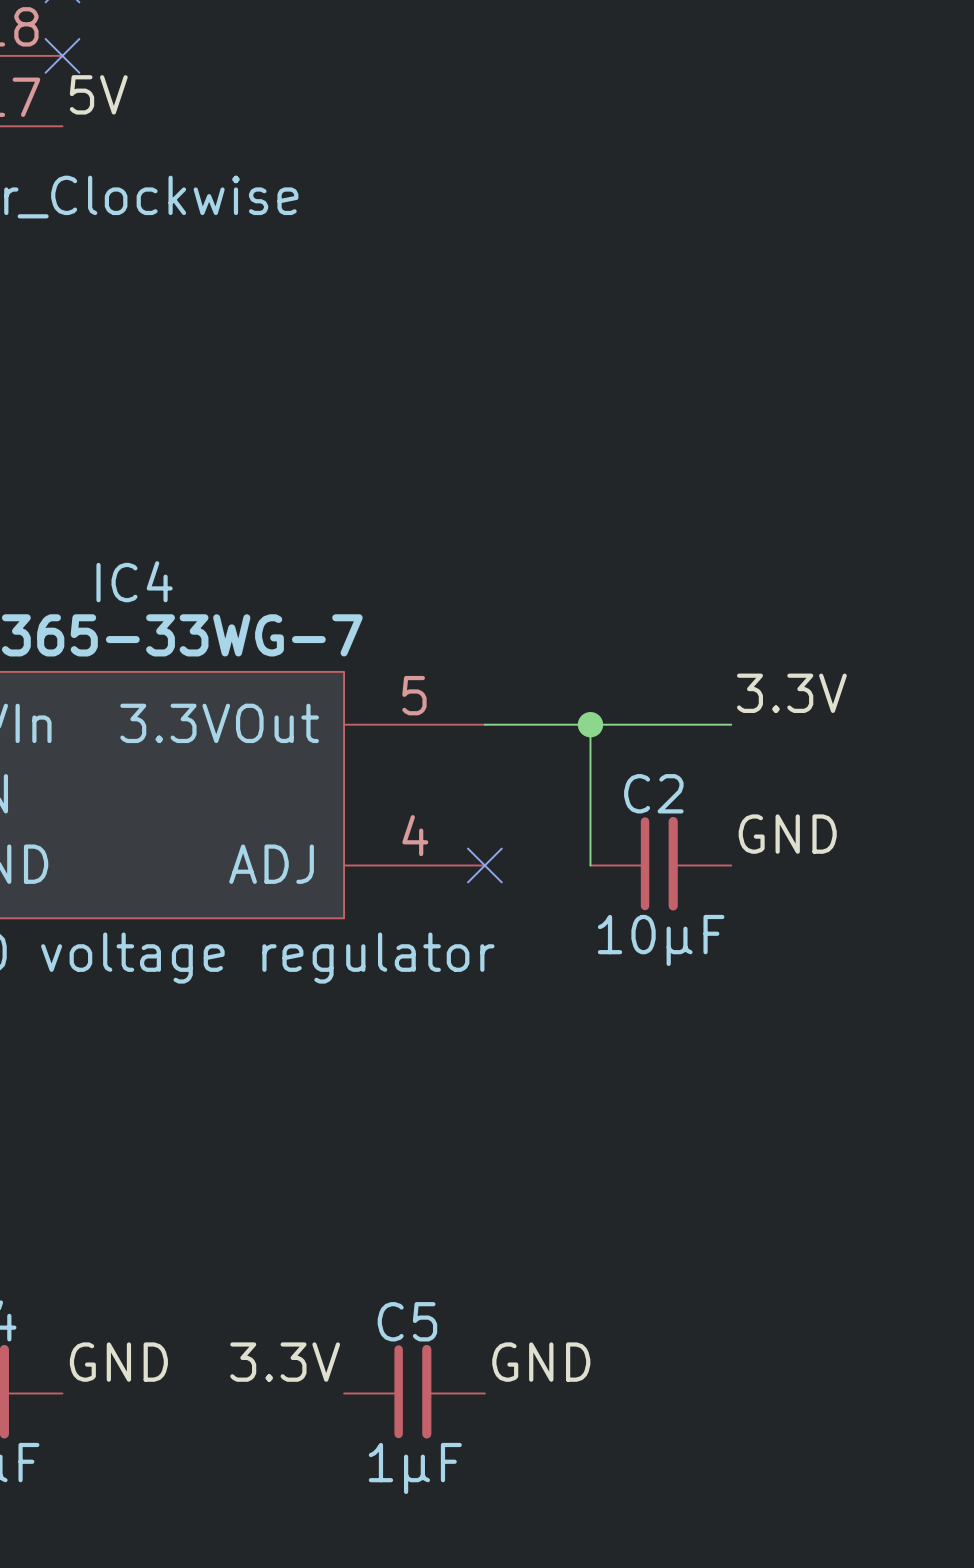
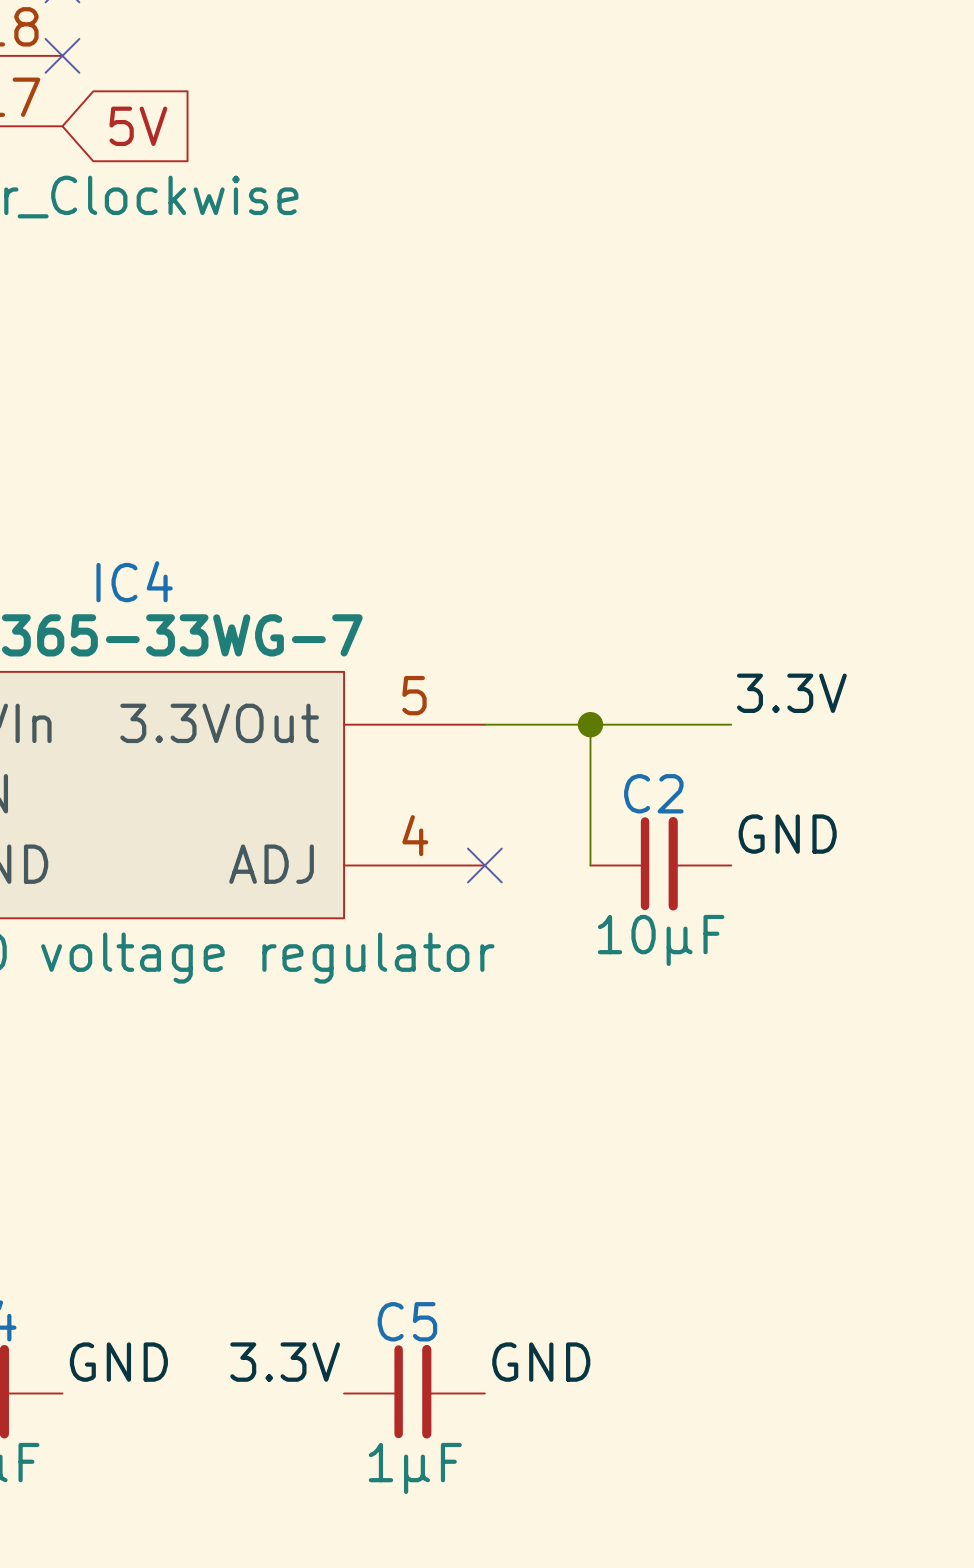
label: 5V (98, 94) -> none
global label: none -> 5V (138, 126)

